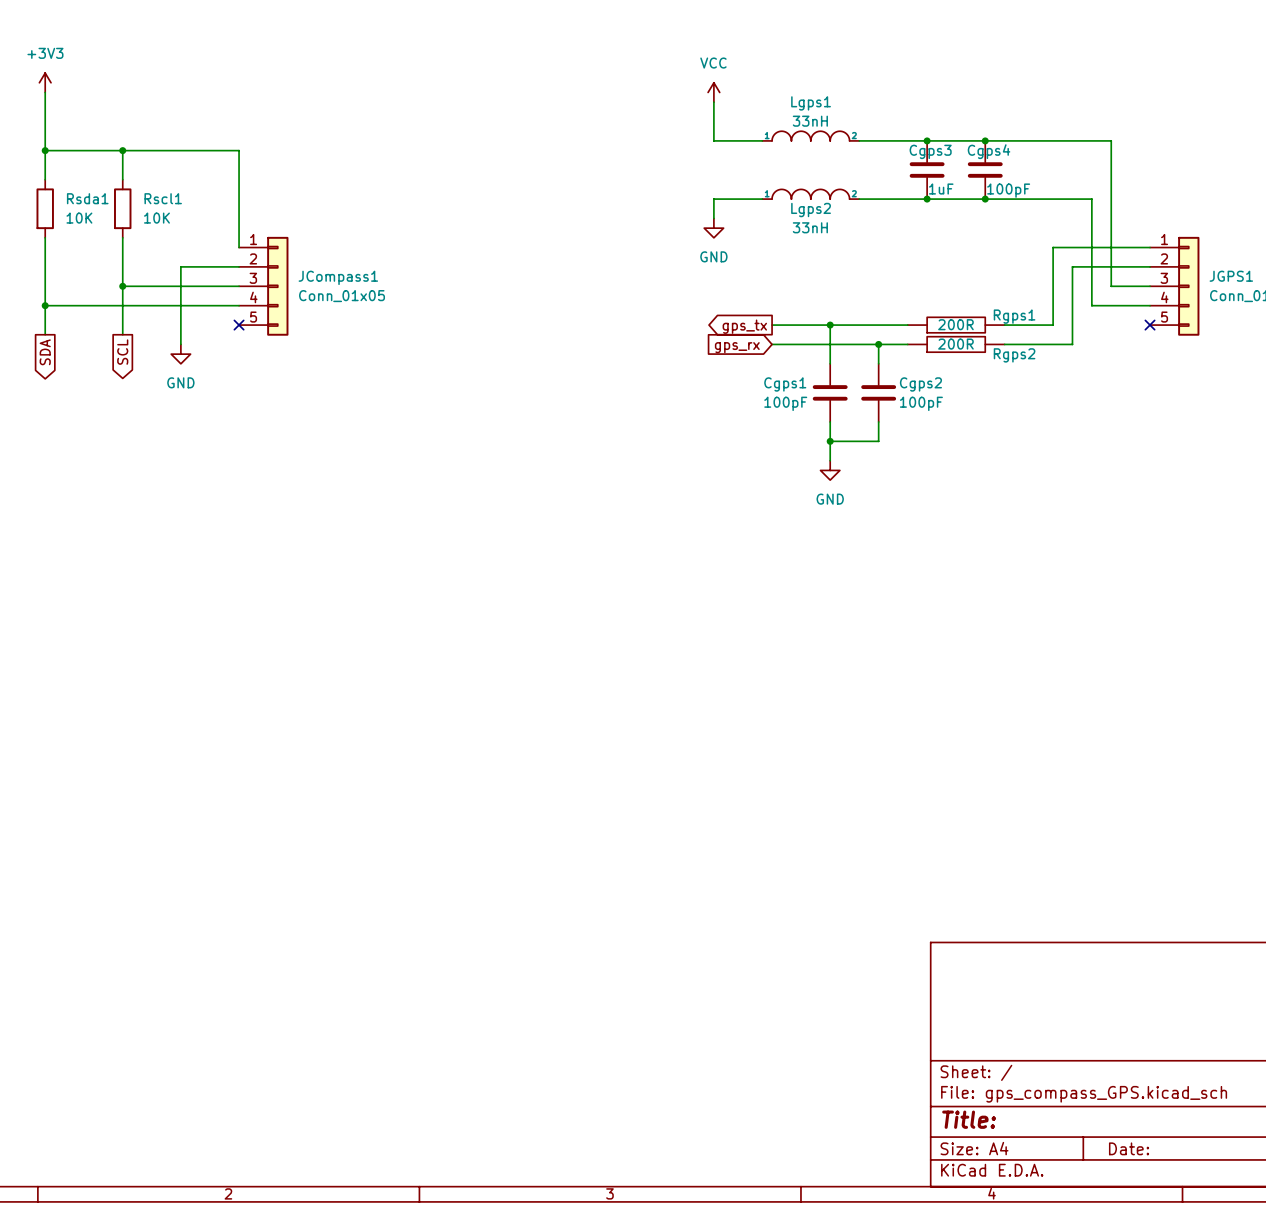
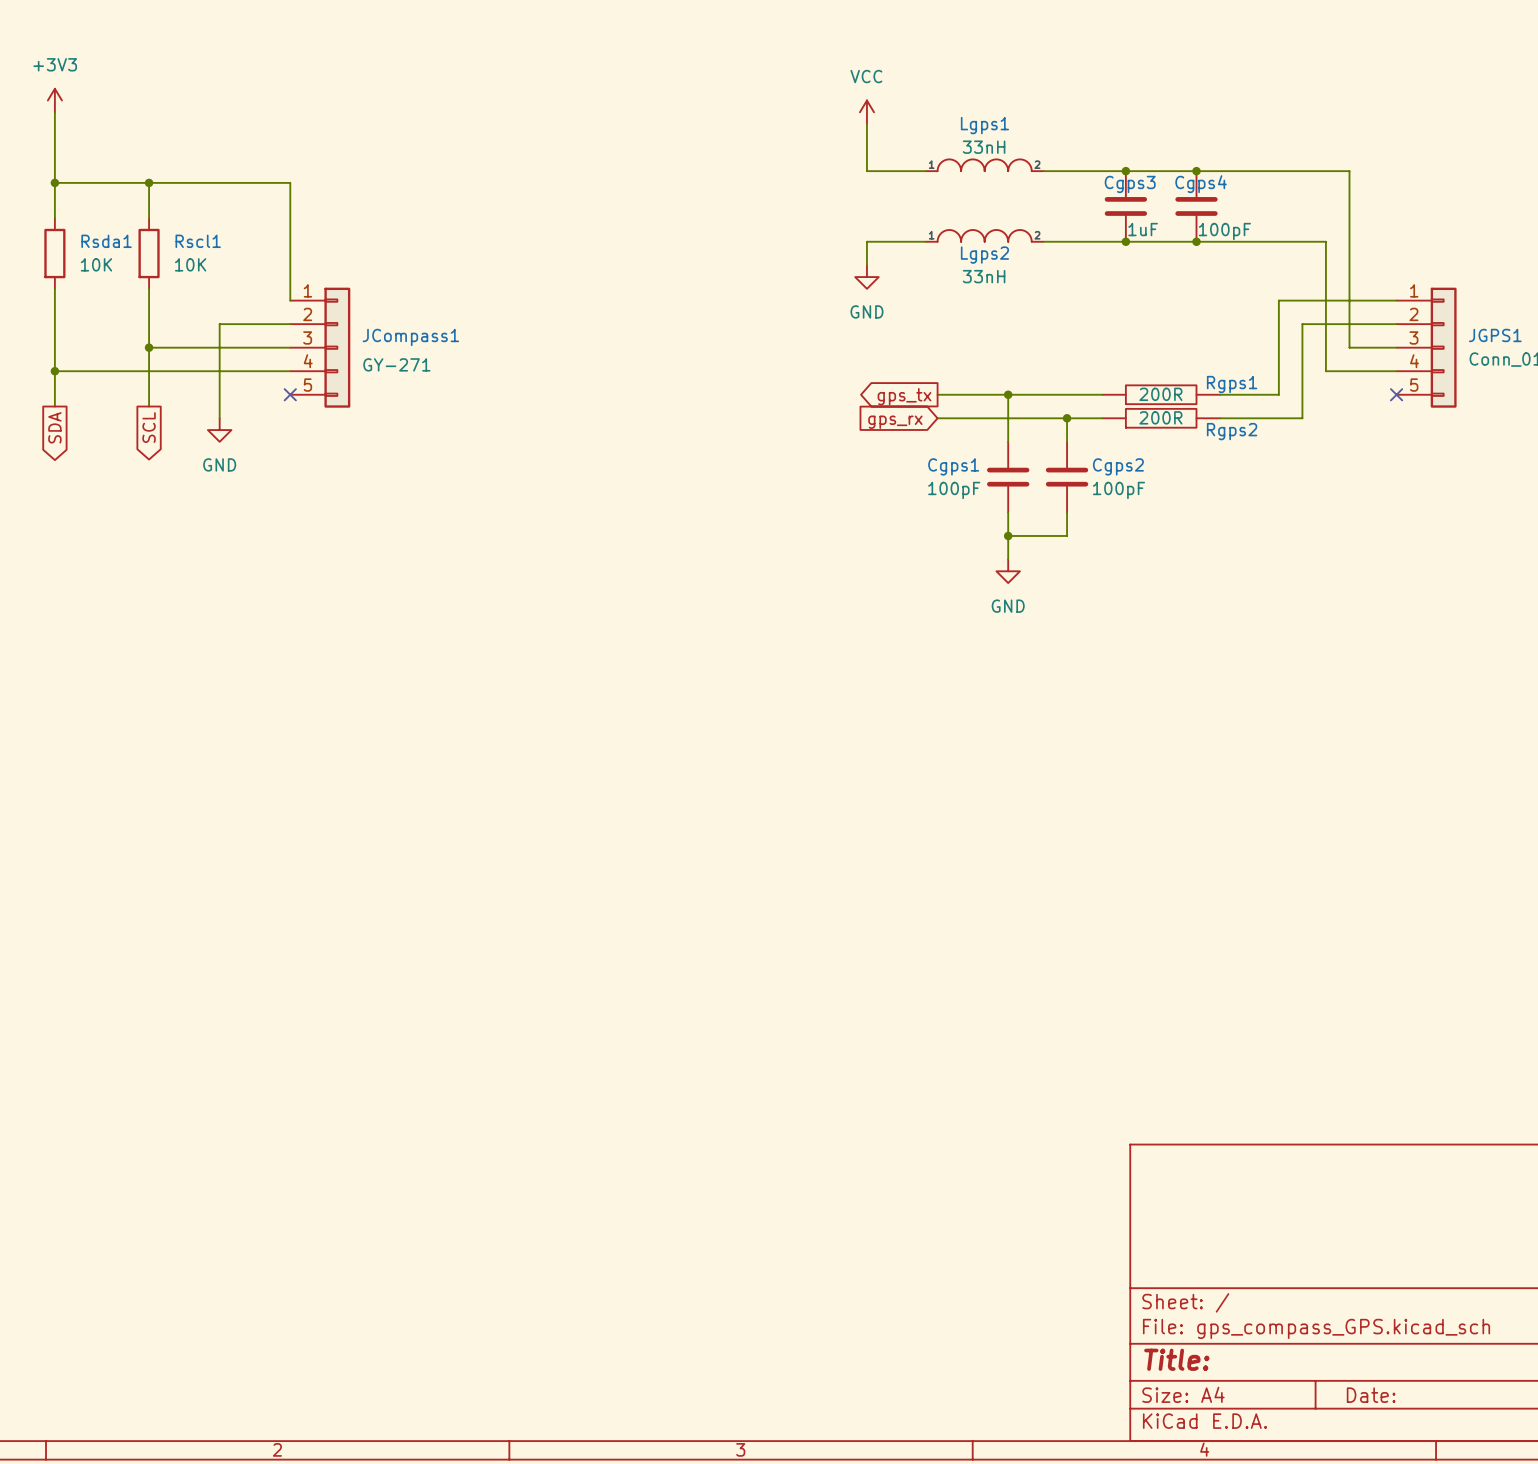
JCompass1 value: Conn_01x05 (342, 296) -> GY-271 (396, 364)

